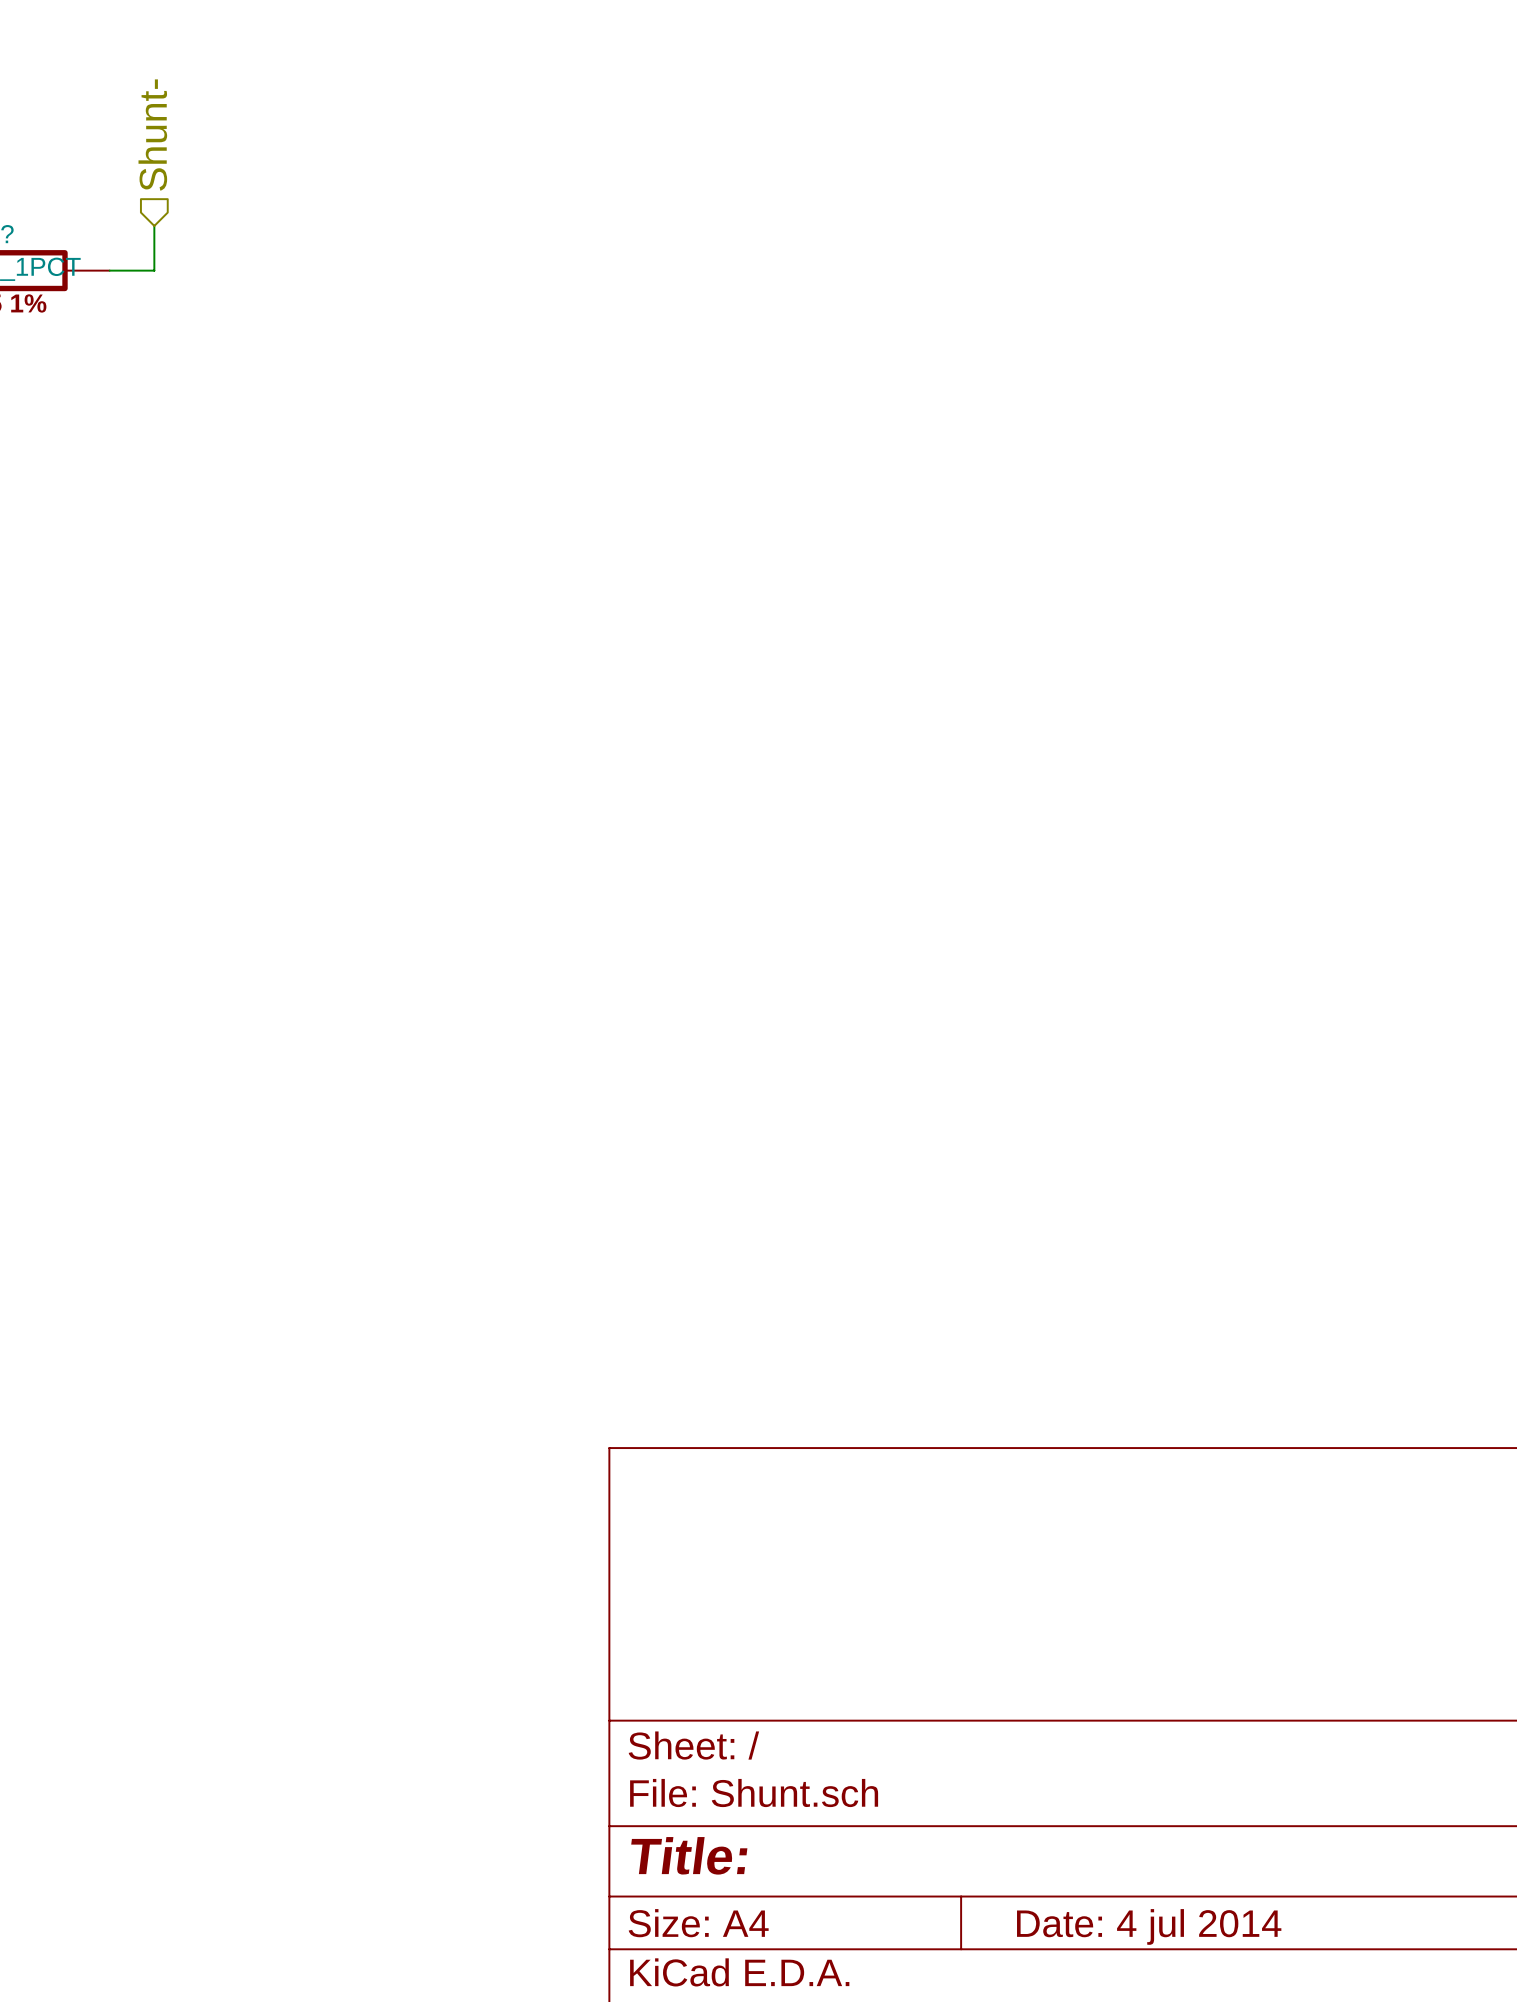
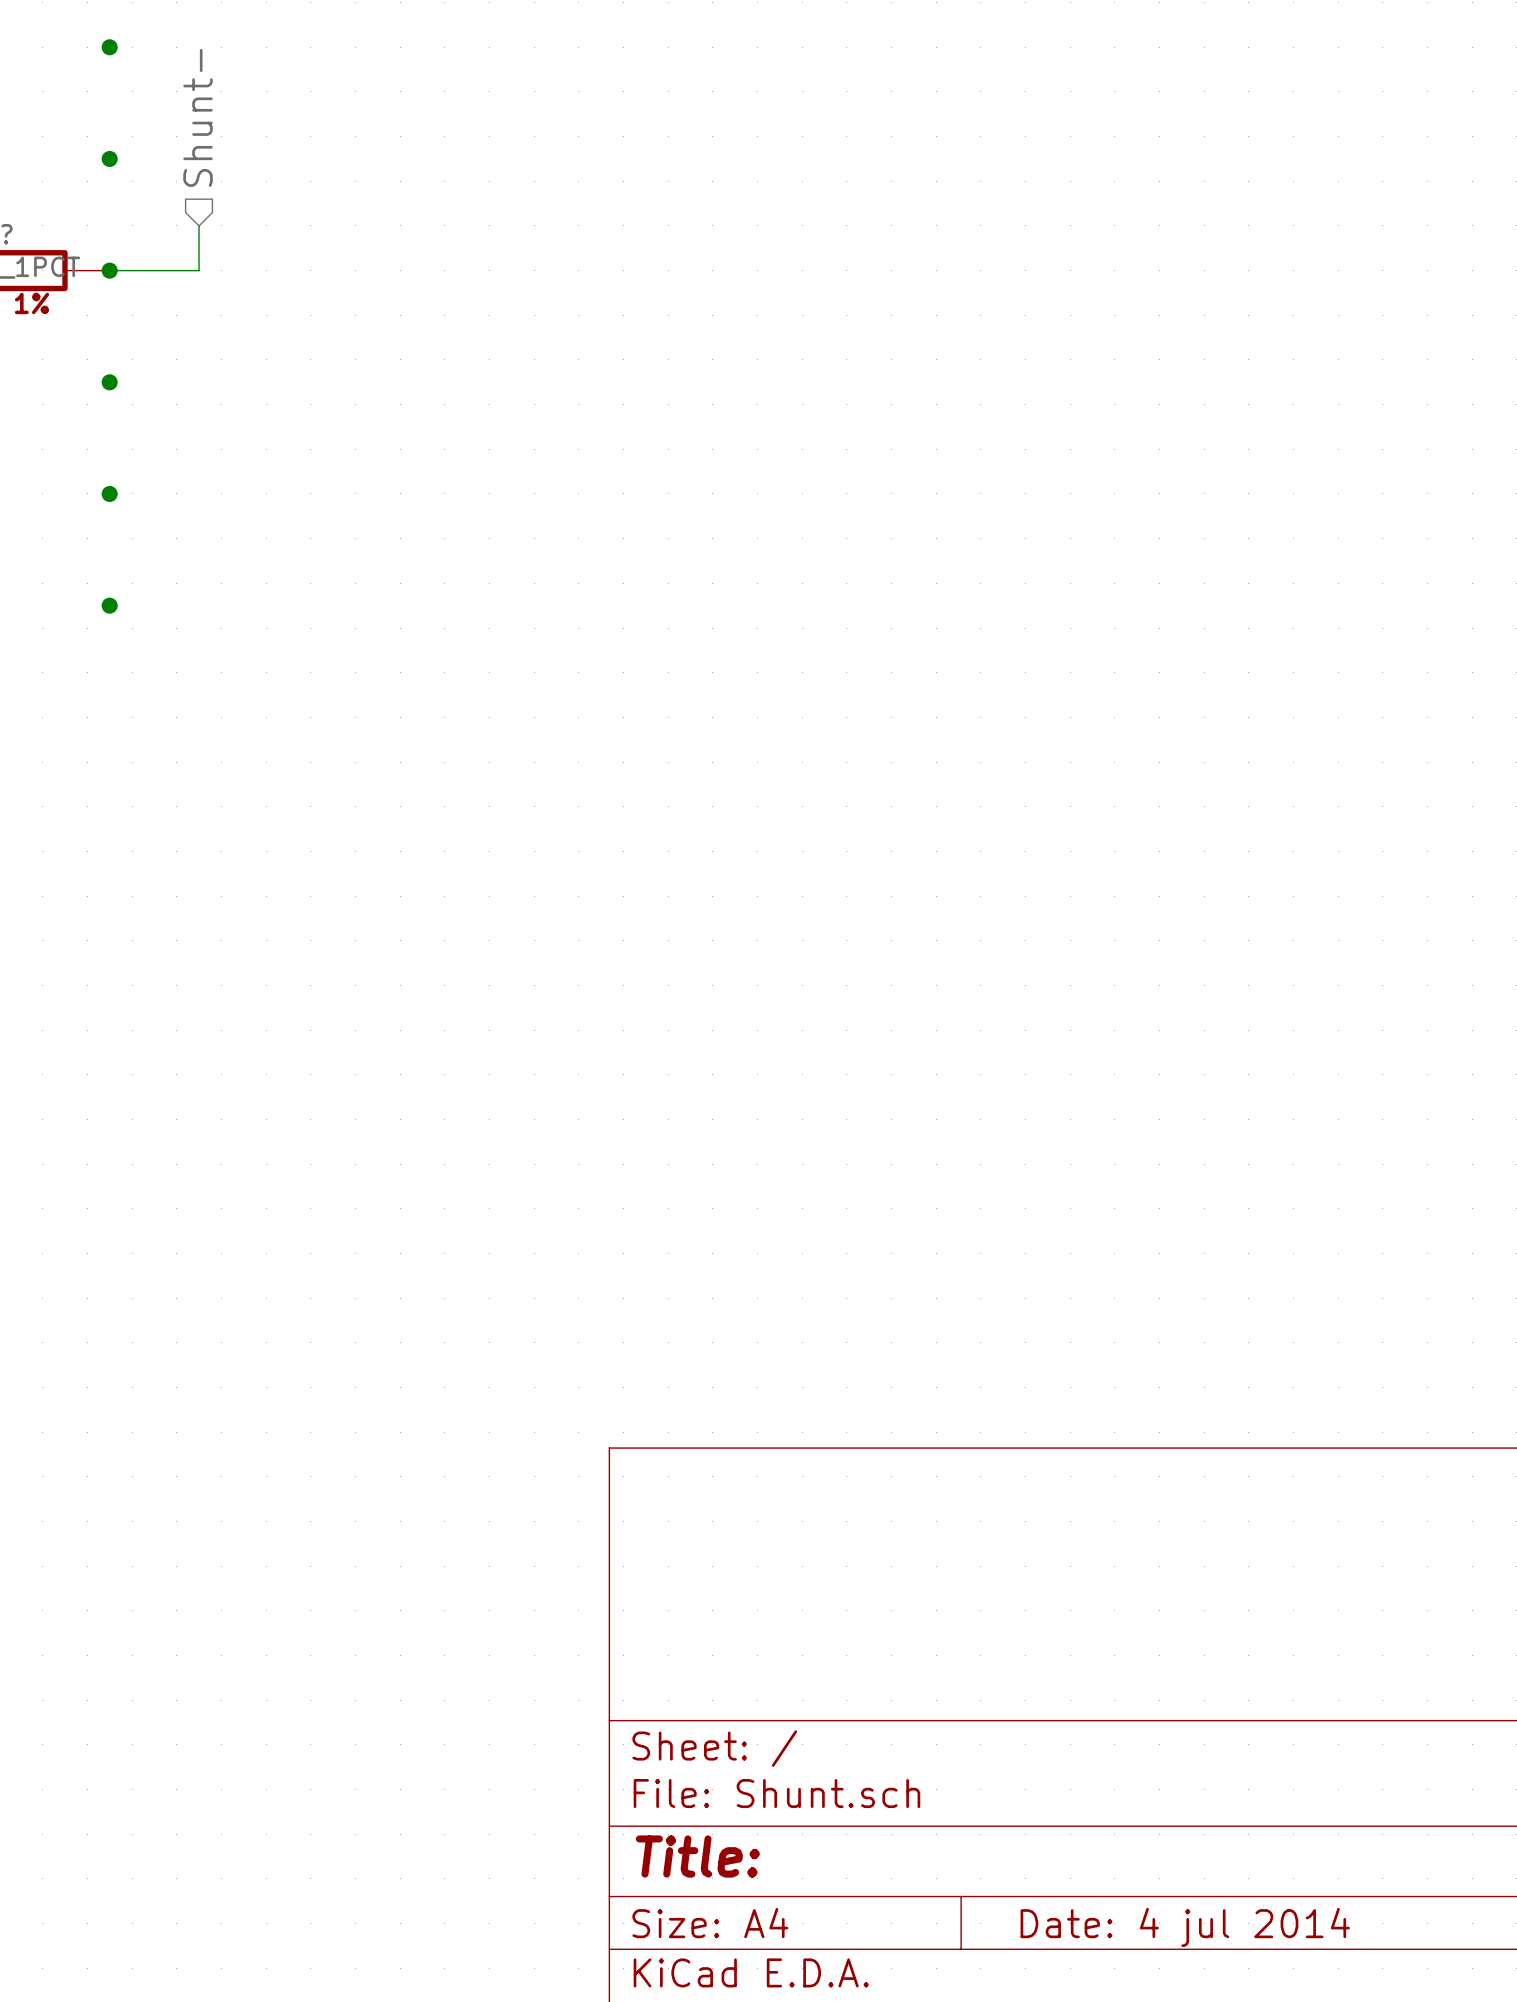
junction: none -> (109, 47)
hierarchical label position: Shunt- (152, 135) -> Shunt- (198, 117)
junction: none -> (109, 158)
wire: (154, 225) (154, 270) -> (199, 225) (199, 270) (154, 270)
junction: none -> (109, 270)
junction: none -> (109, 382)
junction: none -> (109, 493)
junction: none -> (109, 605)

